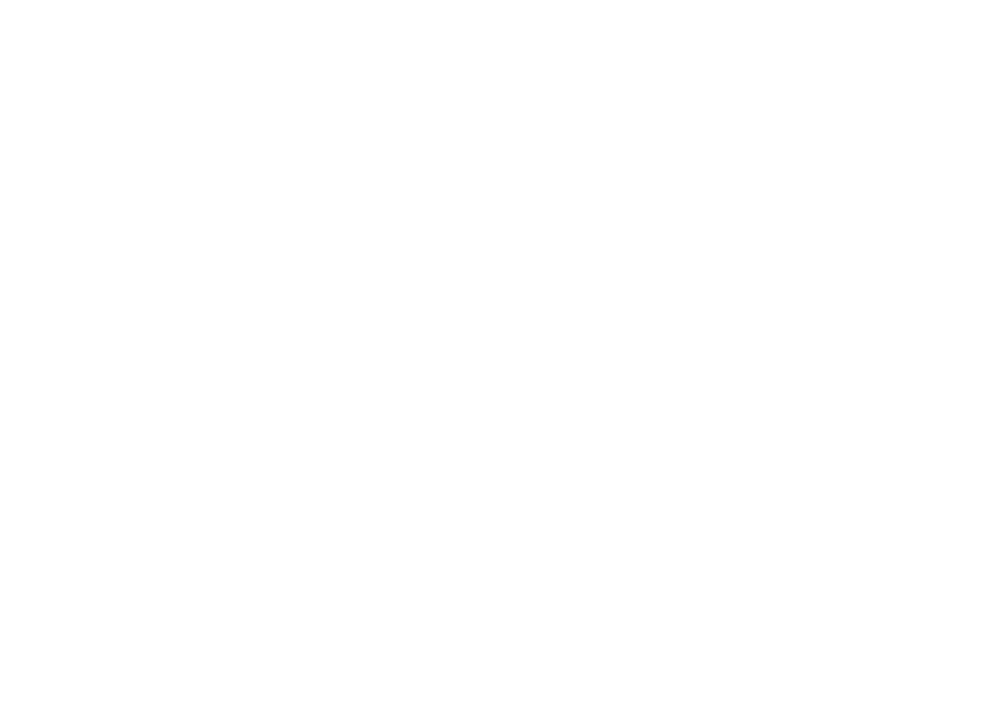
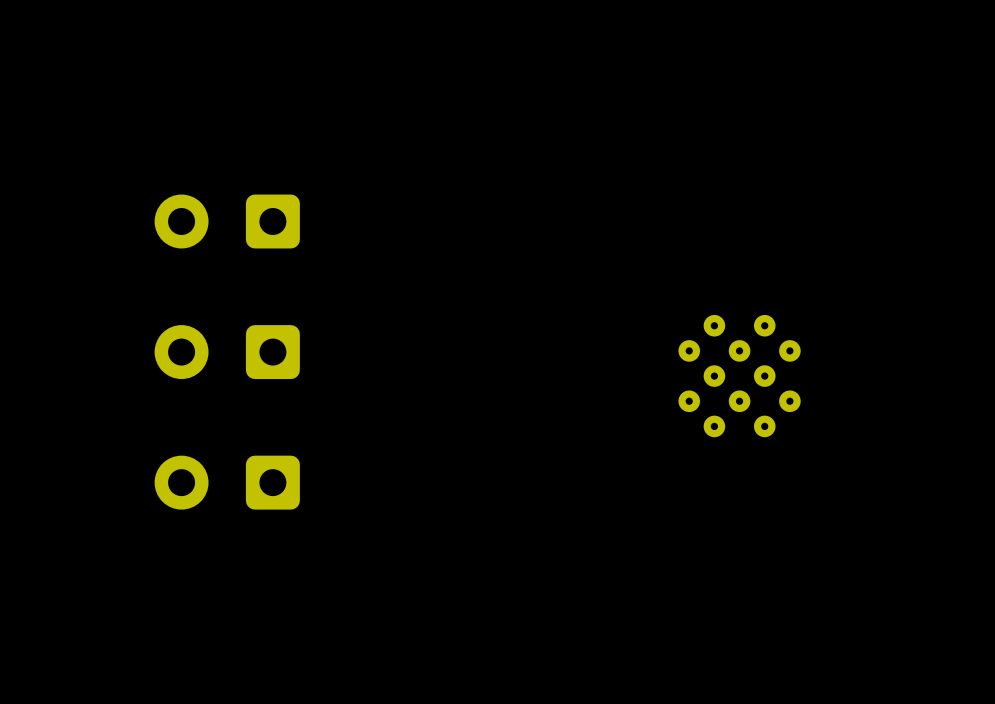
part: none -> (227, 221)
part: none -> (227, 352)
part: none -> (739, 376)
part: none -> (227, 482)

